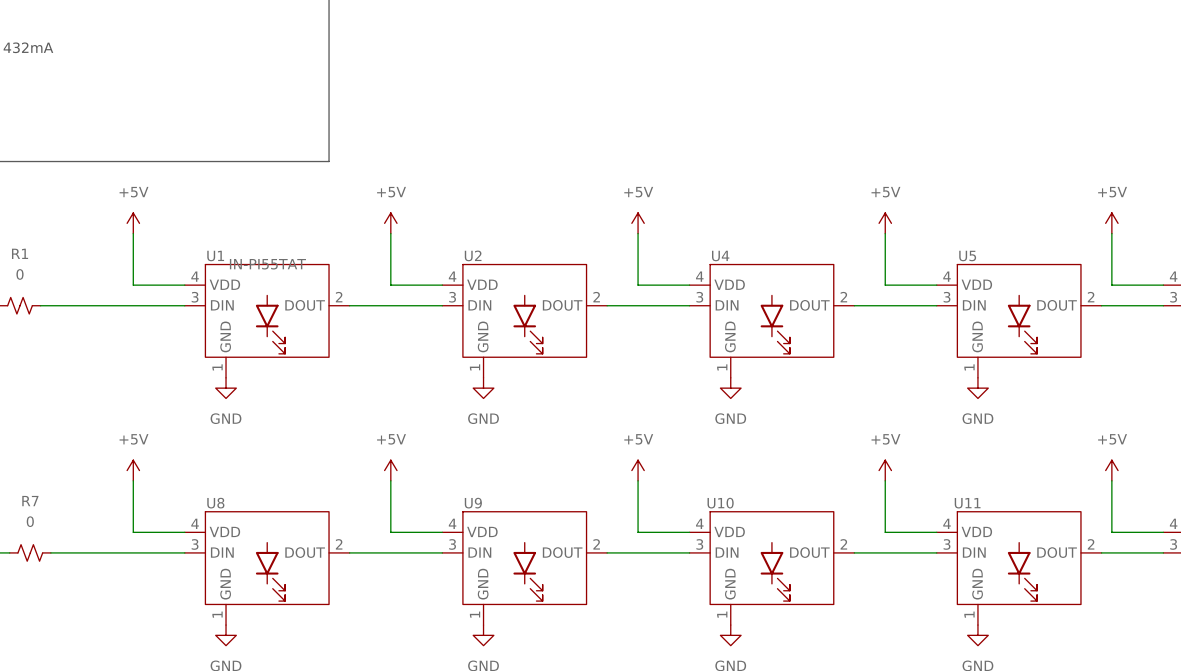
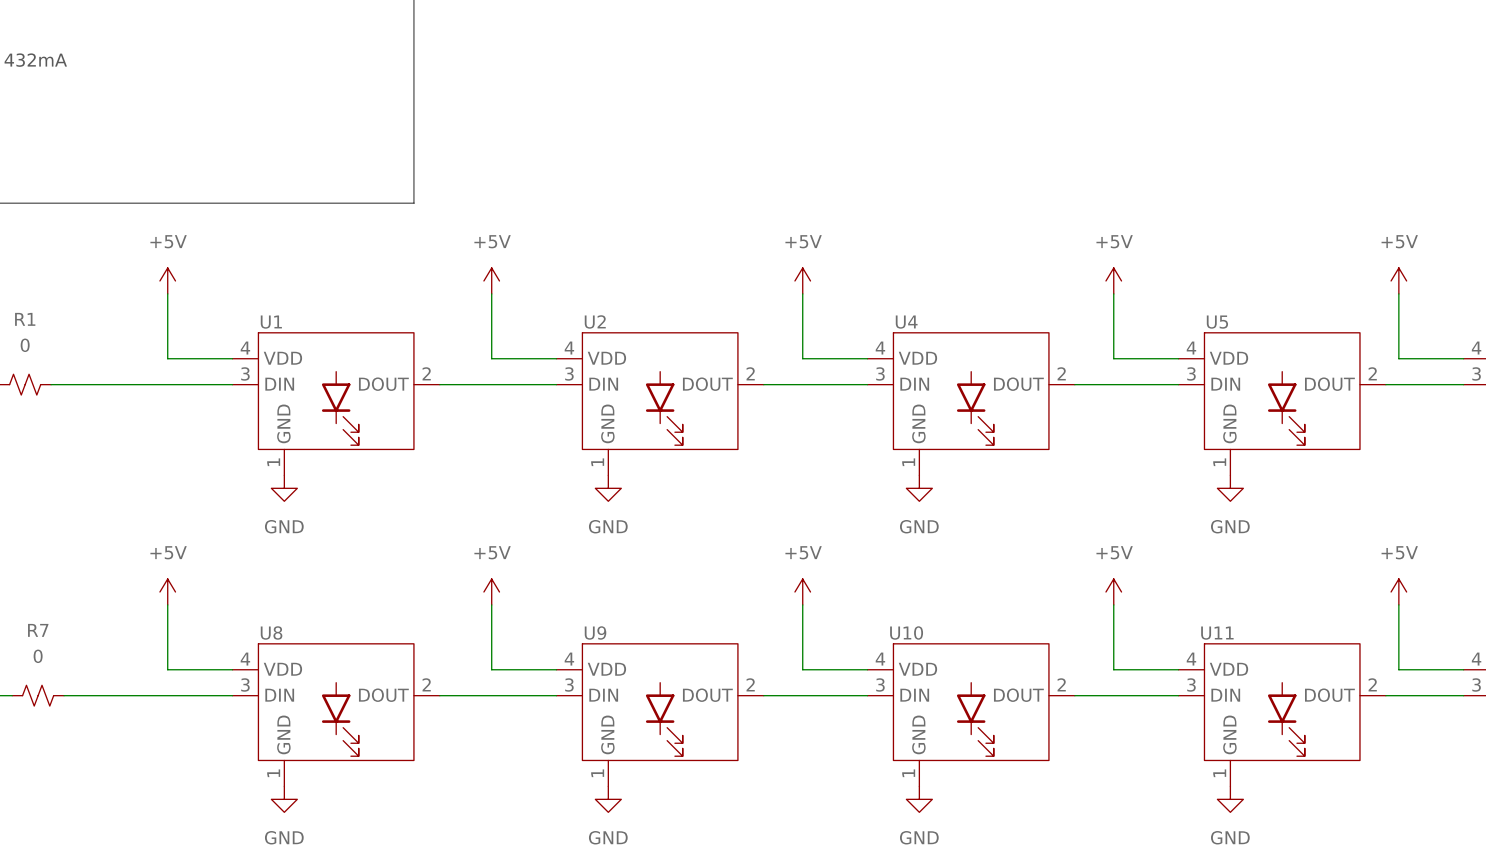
U1 value: IN-PI55TAT (267, 264) -> none

